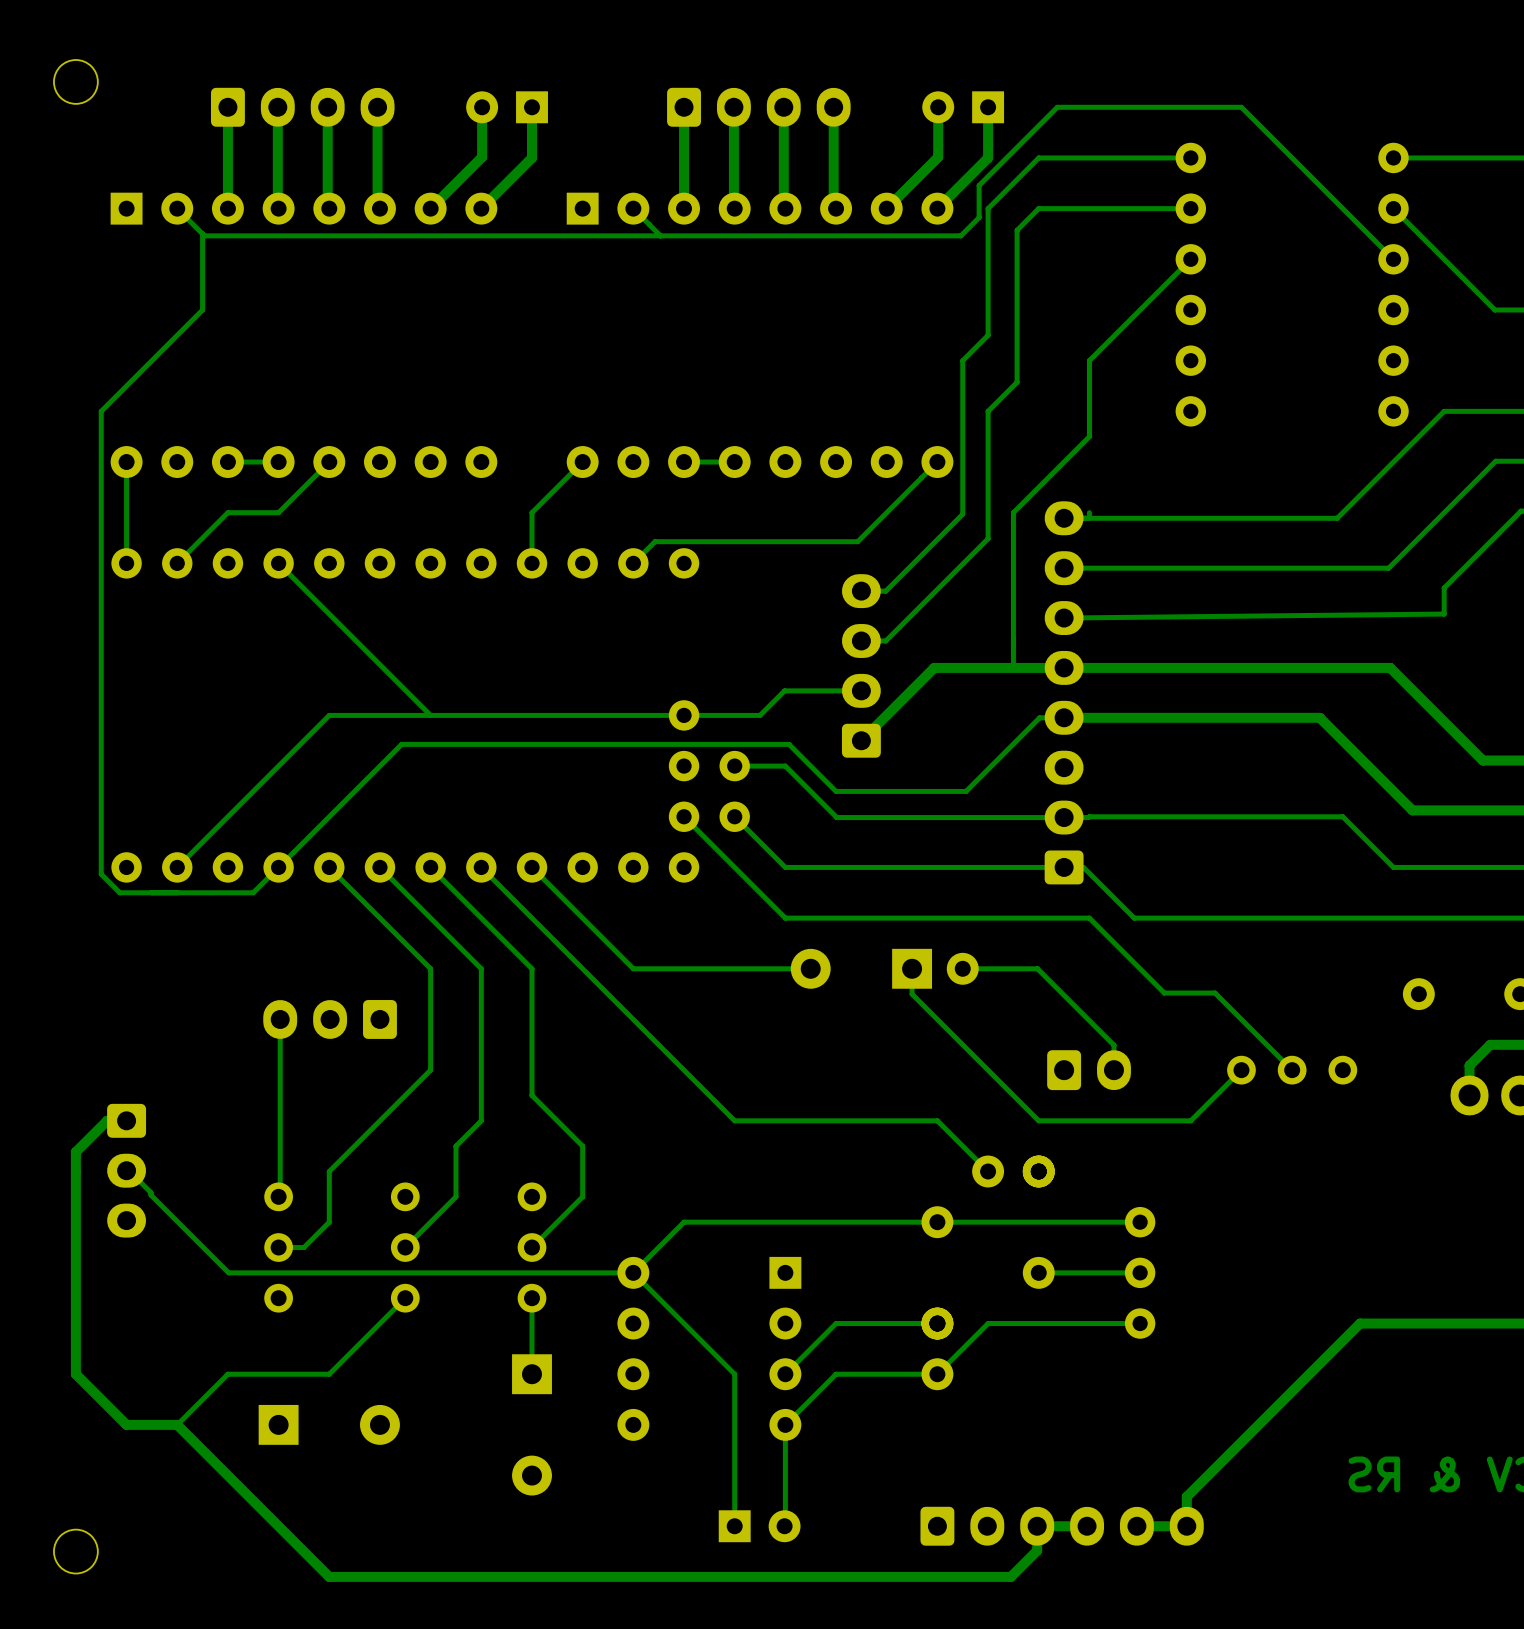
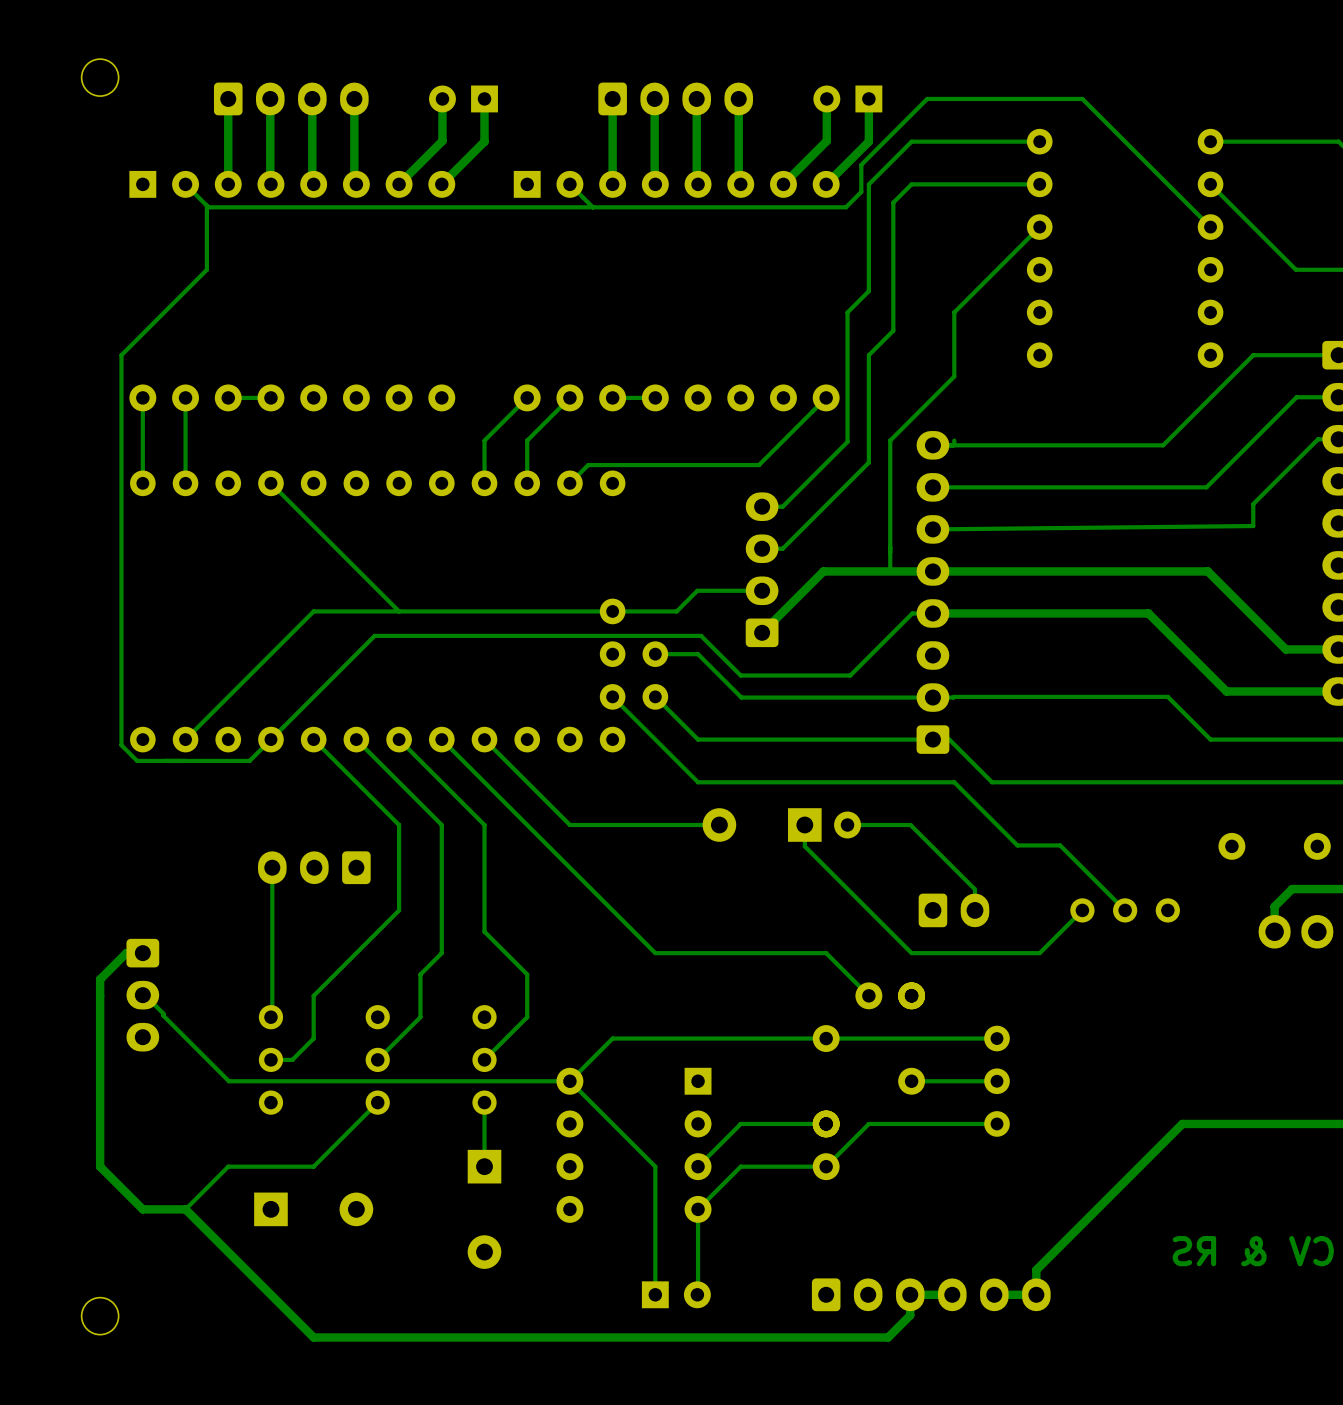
track: (329, 462) (278, 512) (227, 512) (177, 563) -> (185, 397) (185, 483)
track: none -> (569, 397) (527, 440) (527, 483)

